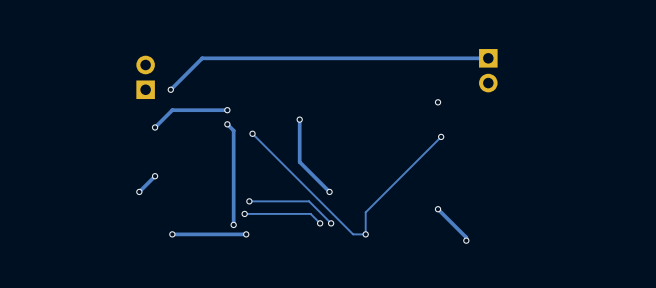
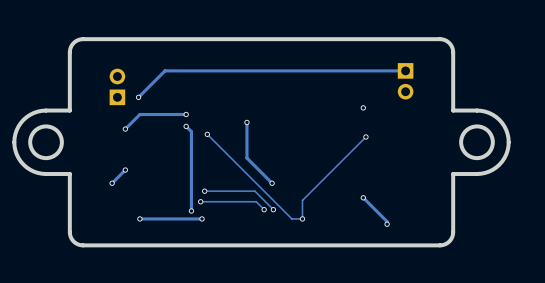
board edge: none -> (439, 39) (79, 39) (73, 43) (69, 50) (69, 110) (41, 110) (26, 117) (20, 122) (15, 134) (15, 150) (20, 161) (33, 171) (41, 173) (69, 174) (69, 233) (73, 241) (79, 244) (443, 244) (450, 240) (453, 233) (453, 174) (481, 173) (492, 169) (504, 158) (508, 142) (504, 126) (492, 114) (481, 110) (453, 110) (453, 50) (448, 41) (439, 39)
round board edge: none -> [28, 124, 64, 161]
round board edge: none -> [459, 124, 495, 161]

